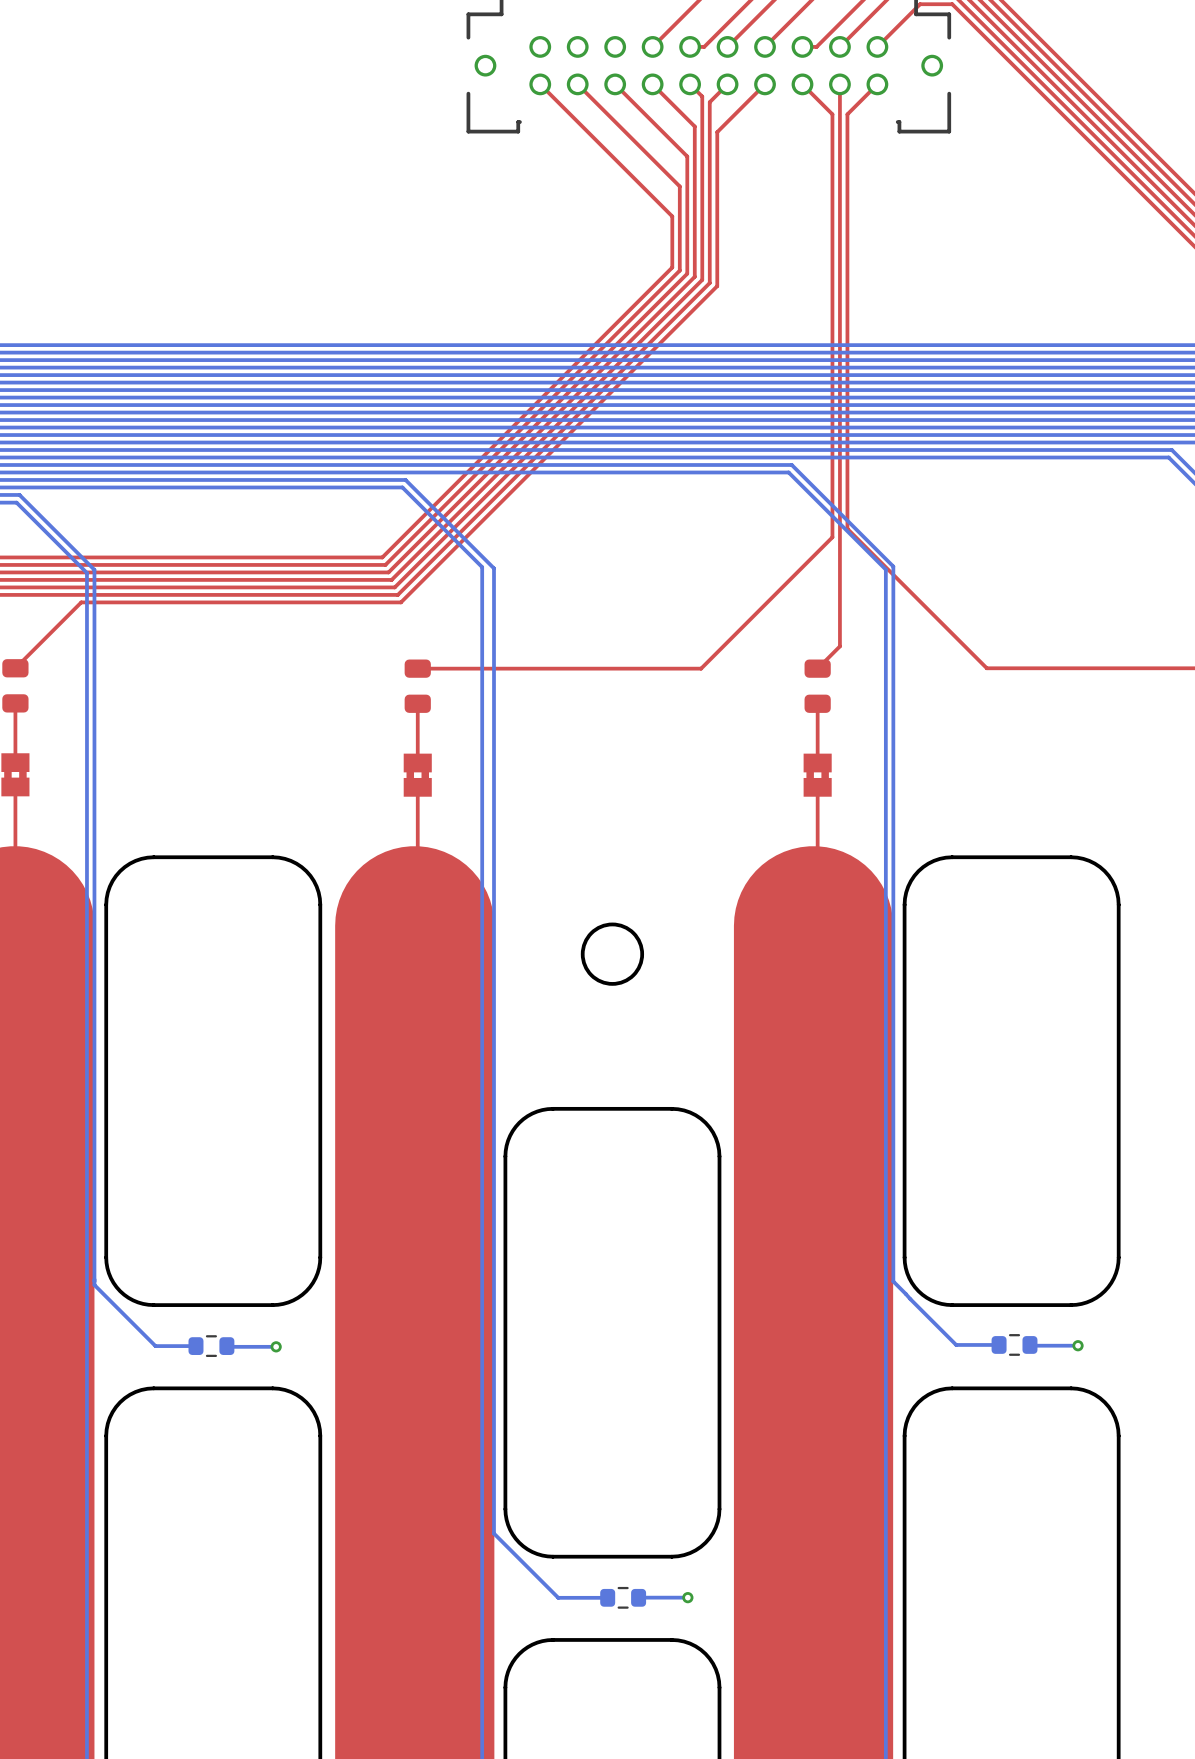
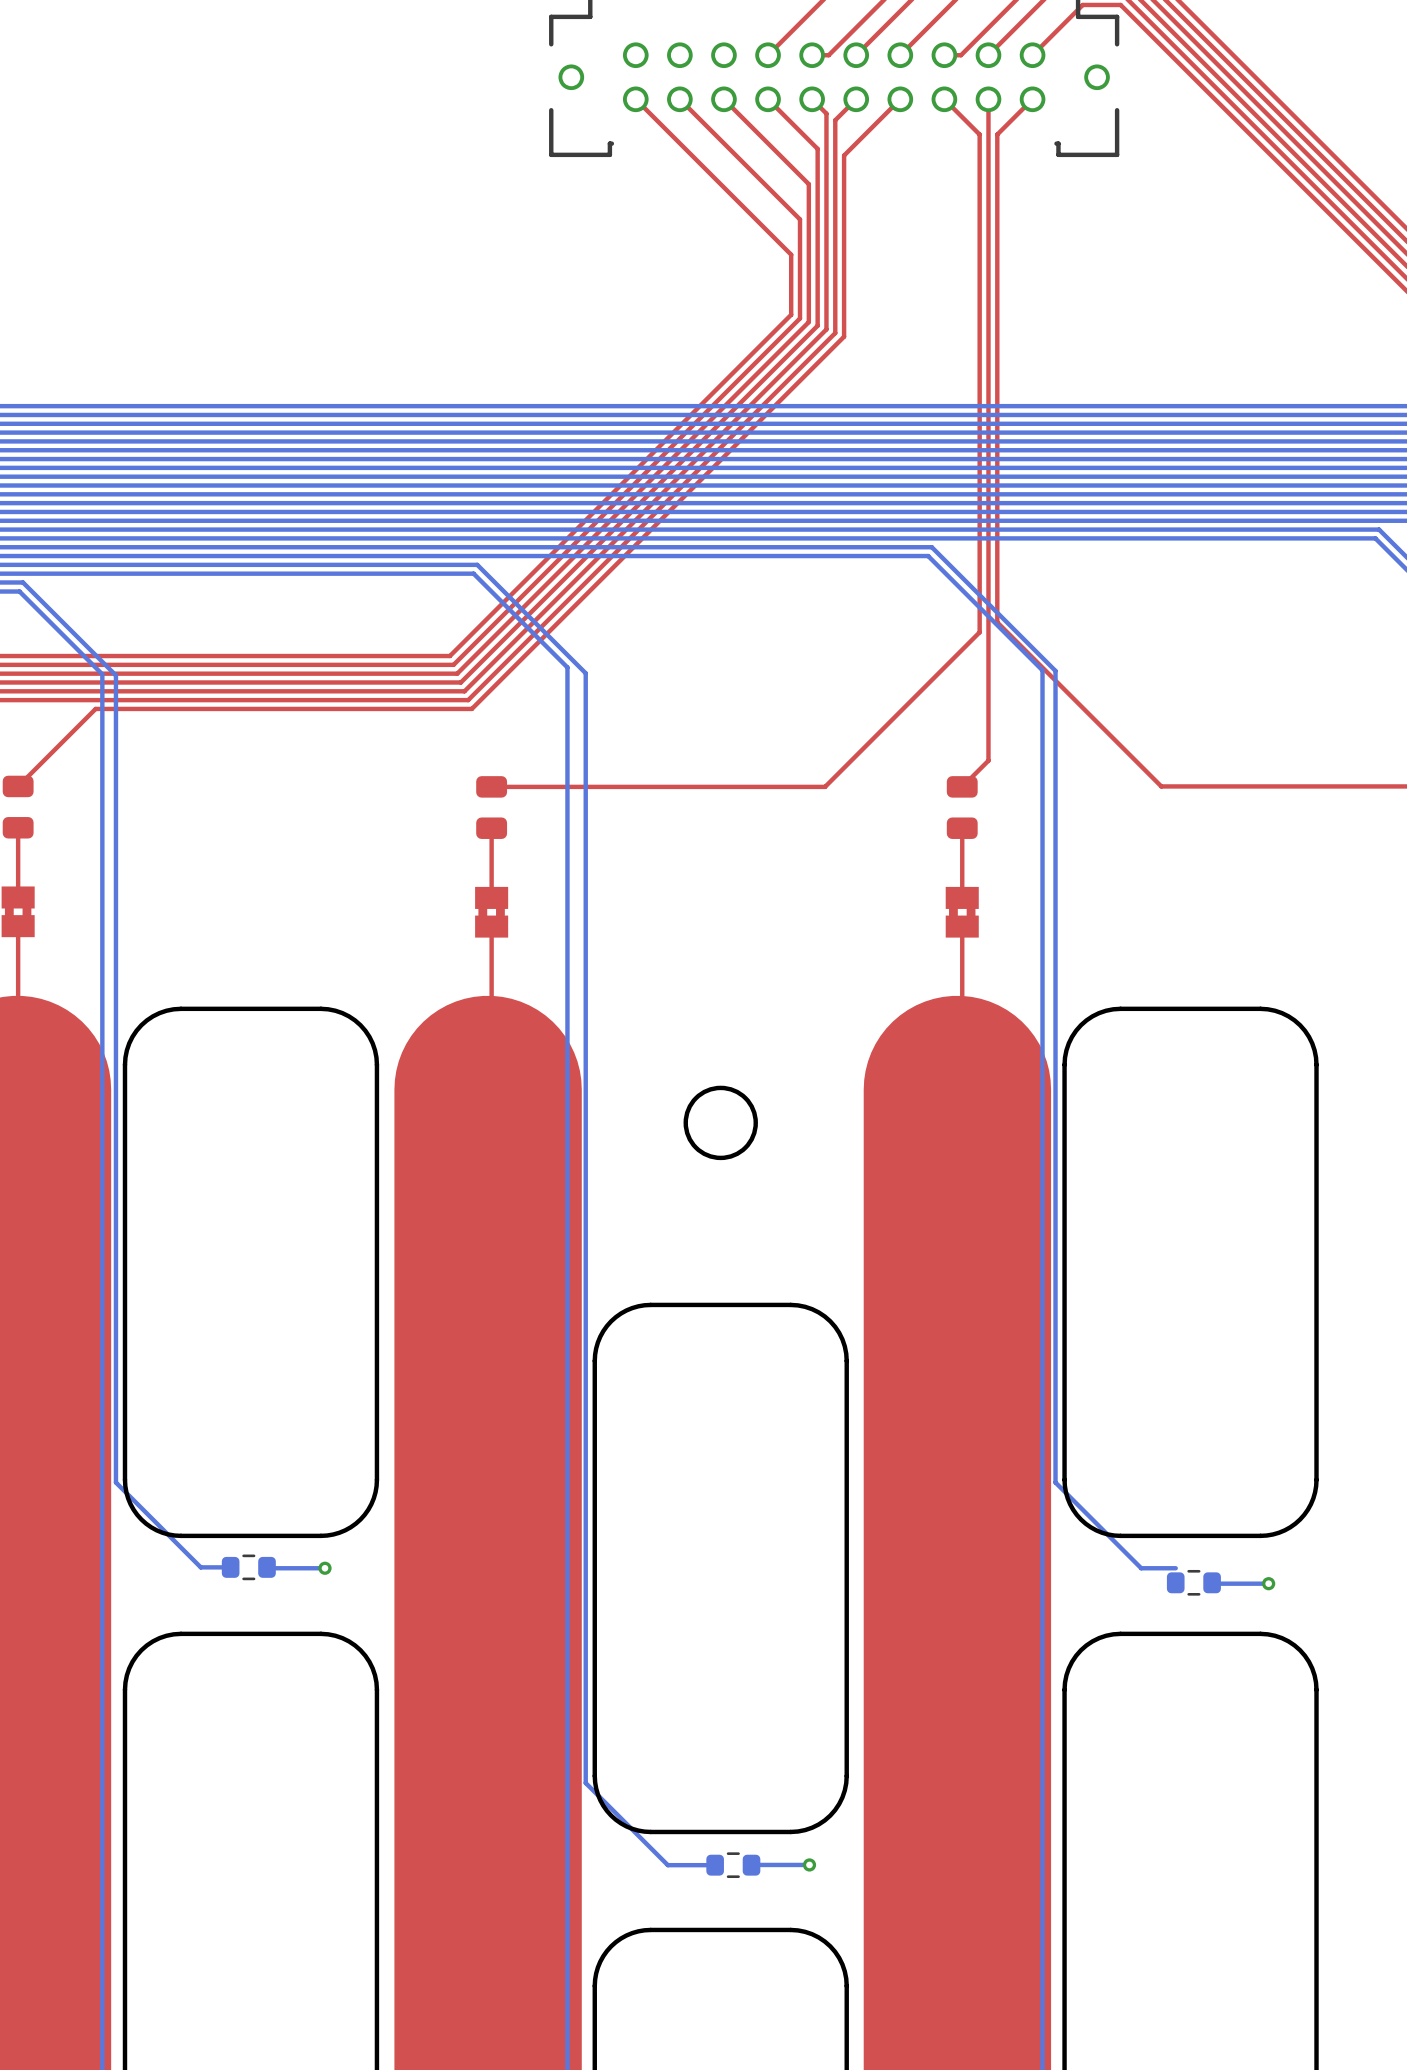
bottom track: (893, 566) (893, 1281) (956, 1344) (999, 1344) -> (1051, 666) (1055, 670) (1055, 1482) (1141, 1568) (1175, 1568)
bottom track: (494, 568) (494, 1533) (558, 1597) (607, 1597) -> (581, 668) (585, 673) (585, 1783) (667, 1865) (715, 1865)
bottom track: (94, 569) (94, 1285) (155, 1346) (195, 1346) -> (111, 670) (115, 675) (115, 1482) (200, 1567) (230, 1567)
part position: (211, 1346) -> (248, 1567)
bottom track: (276, 1346) (227, 1346) -> (324, 1568) (268, 1568)
via position: (276, 1346) -> (324, 1568)
part position: (623, 1597) -> (733, 1865)
bottom track: (687, 1597) (639, 1597) -> (809, 1864) (752, 1864)
via position: (687, 1597) -> (809, 1864)

